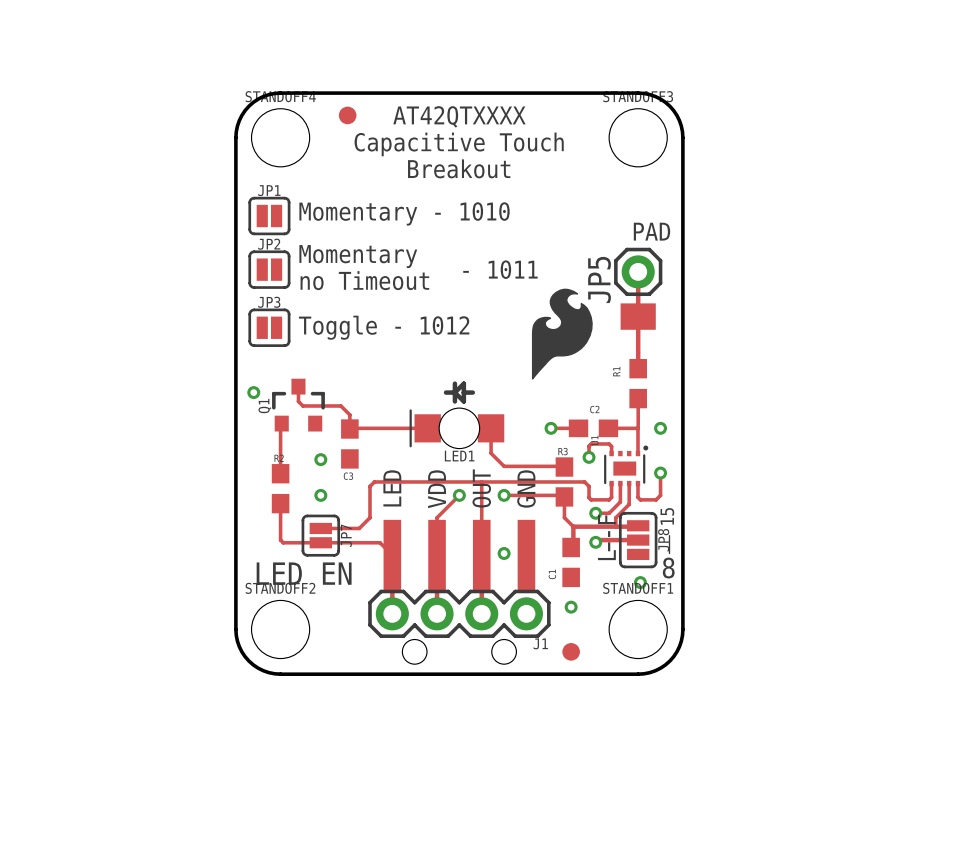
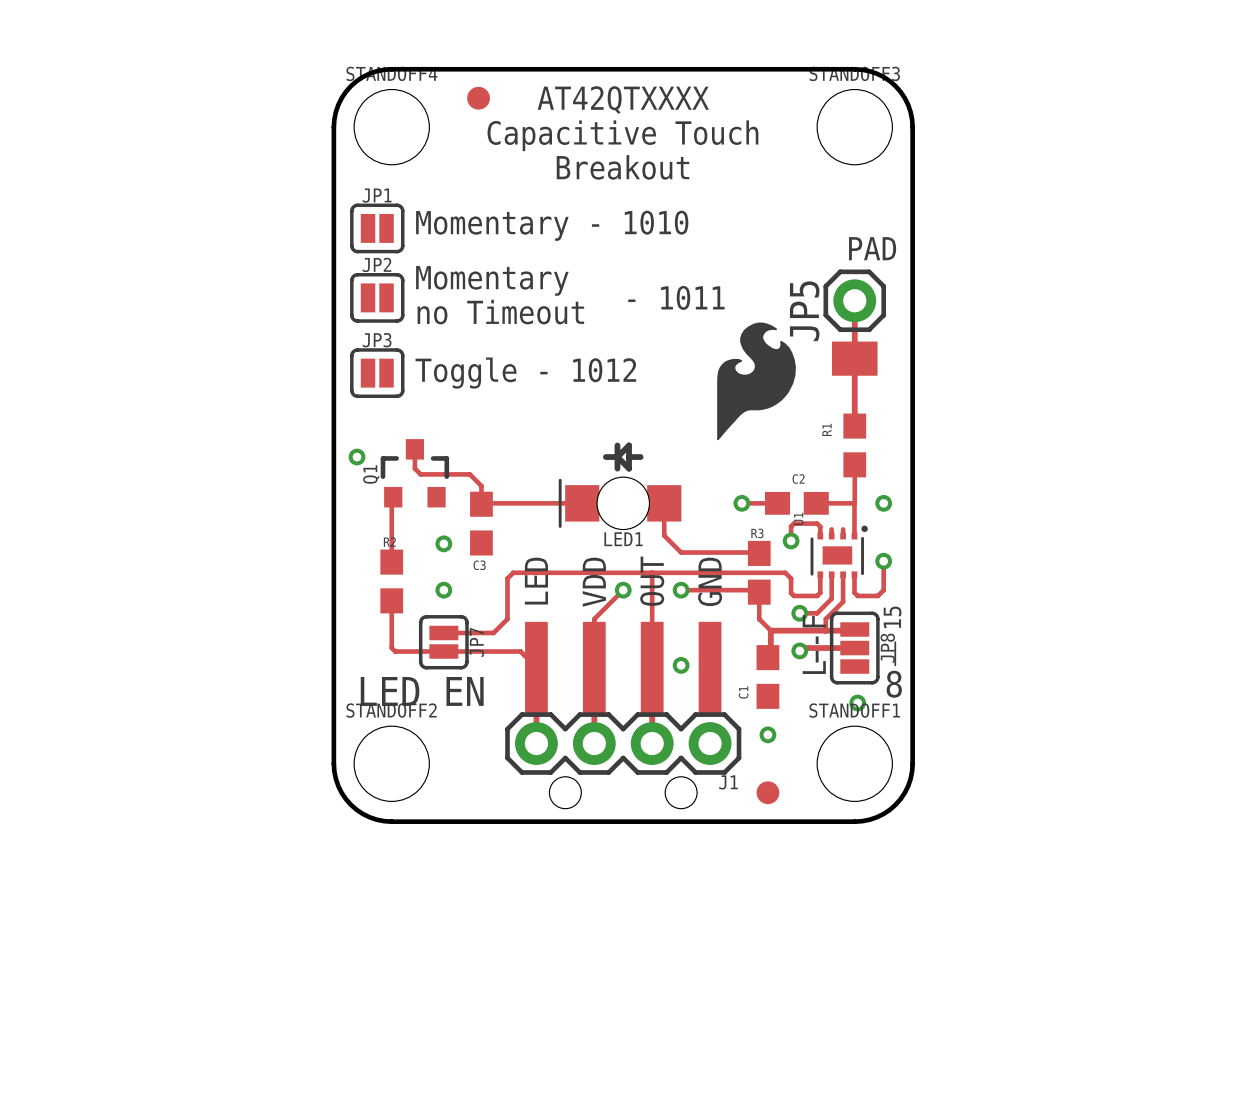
track: none -> (831, 529) (831, 535)
track: none -> (843, 529) (843, 535)

